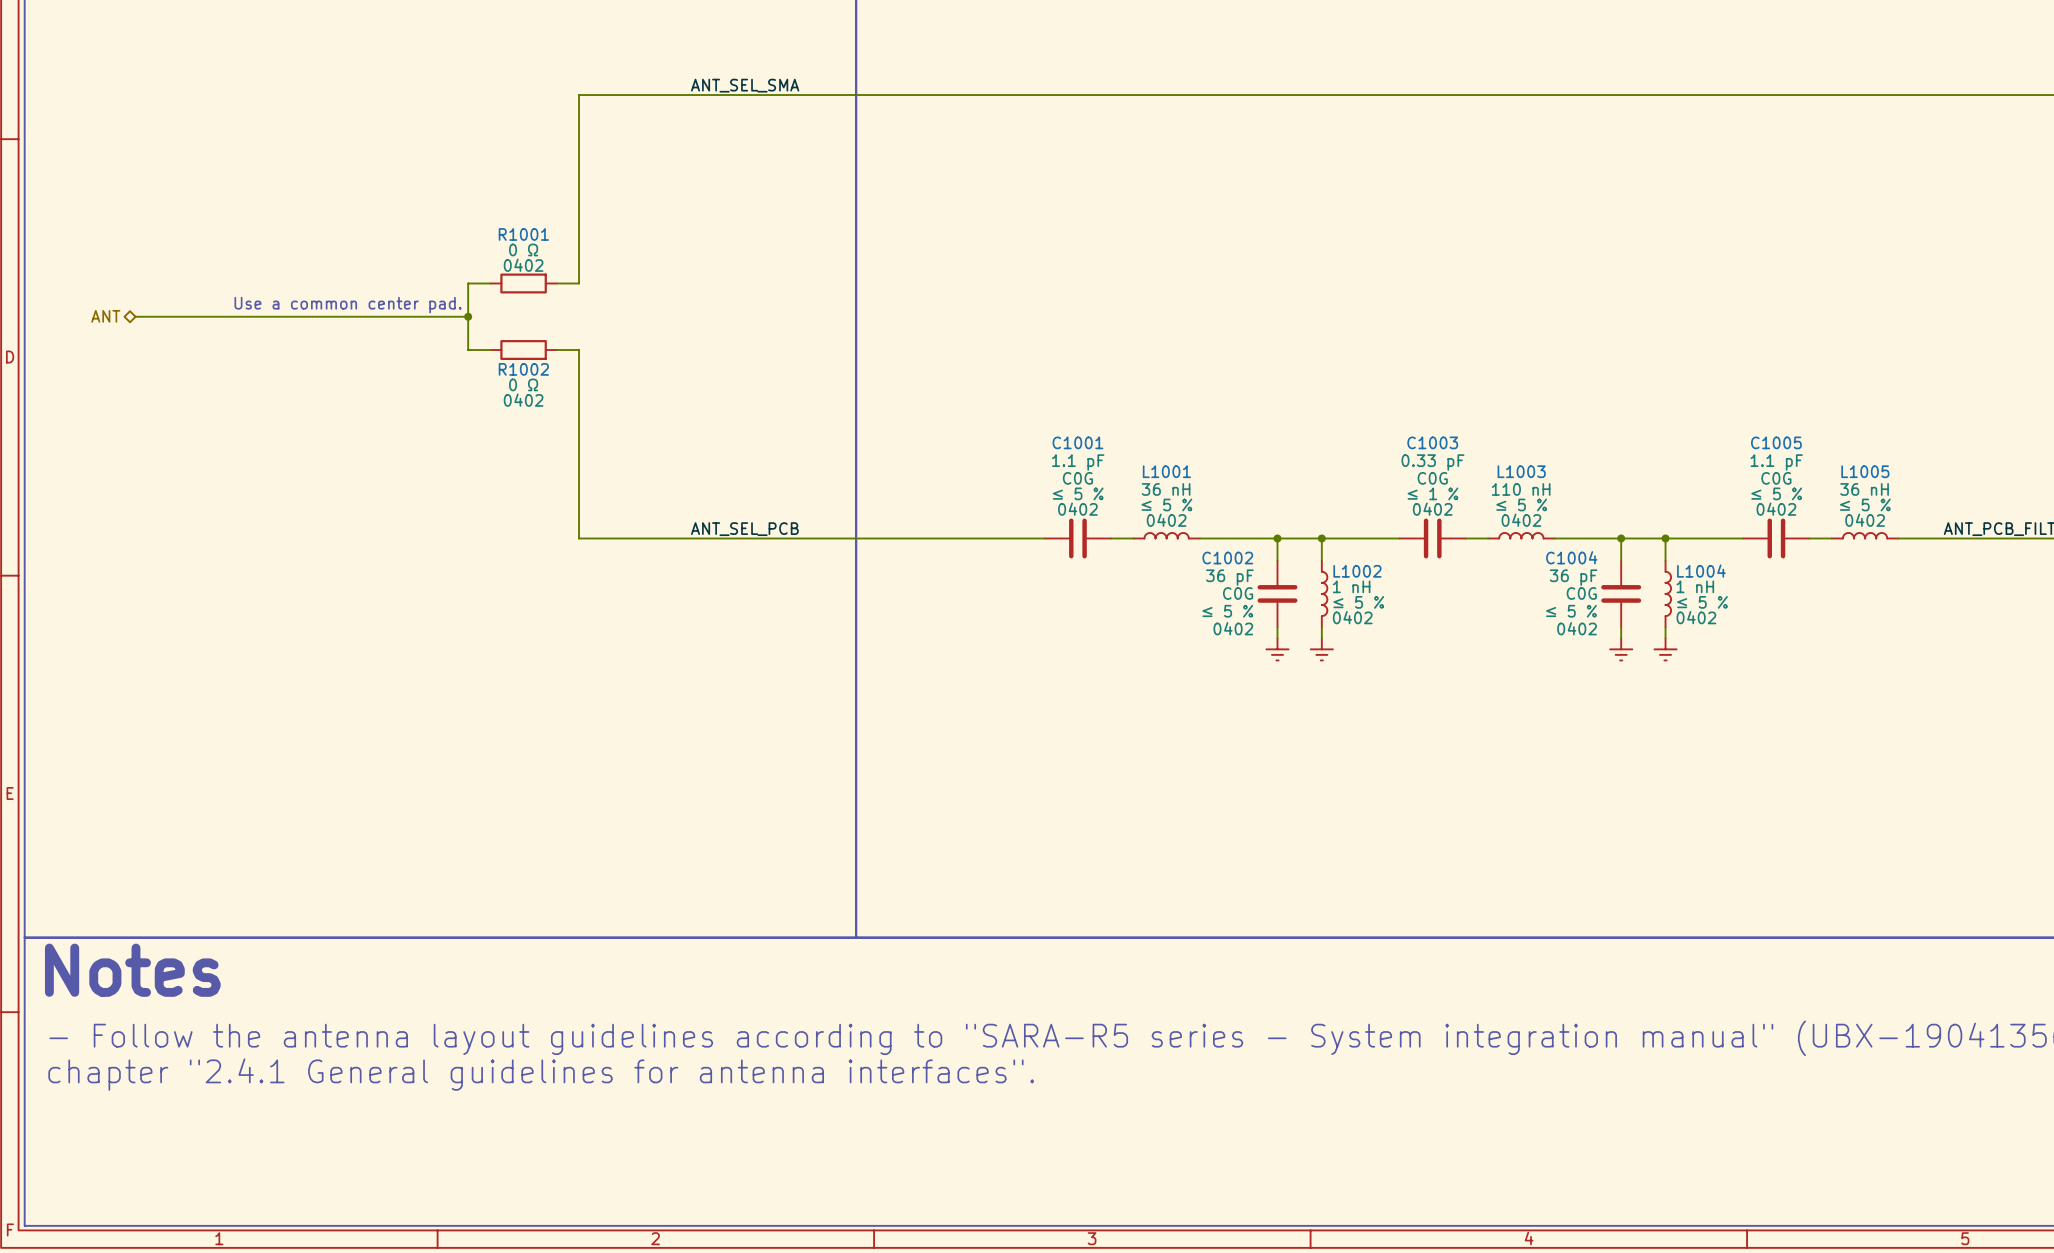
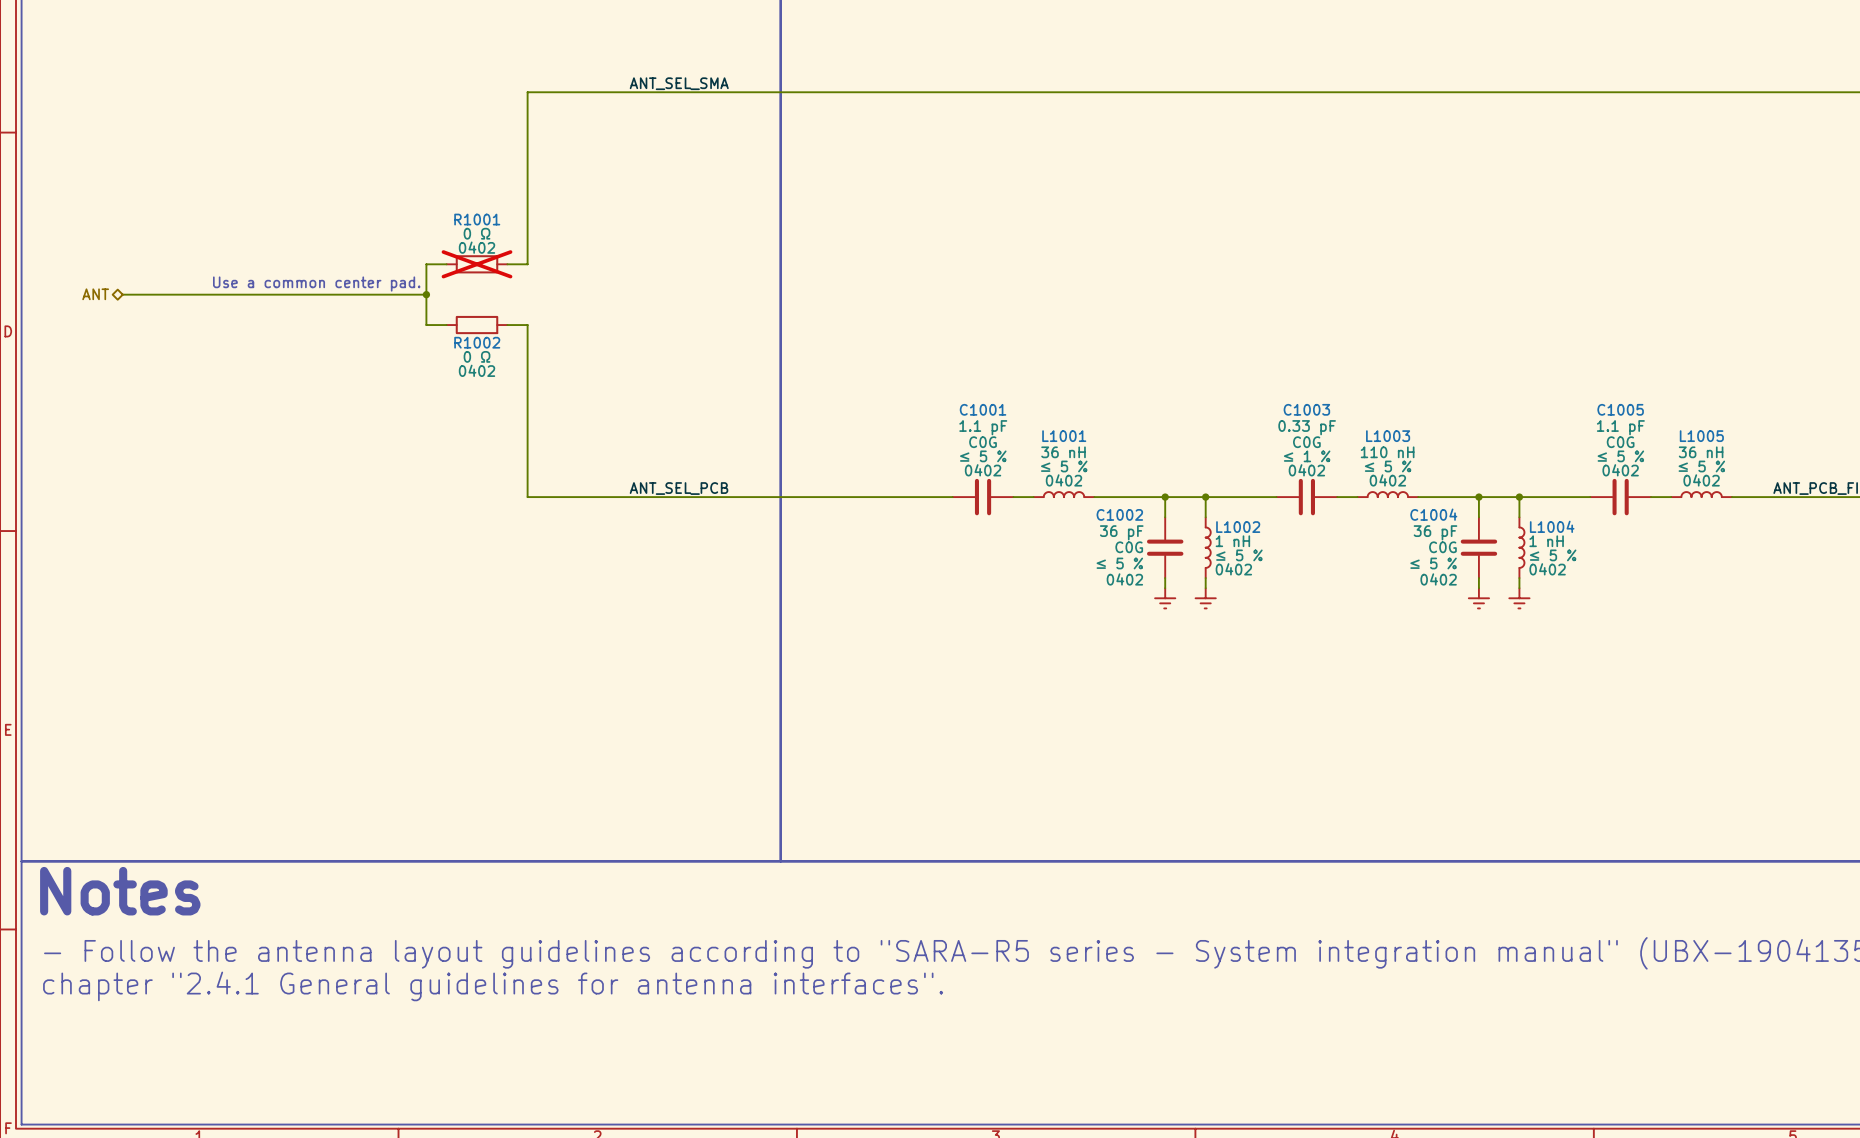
R1001 do-not-place cross: none -> (477, 264)

